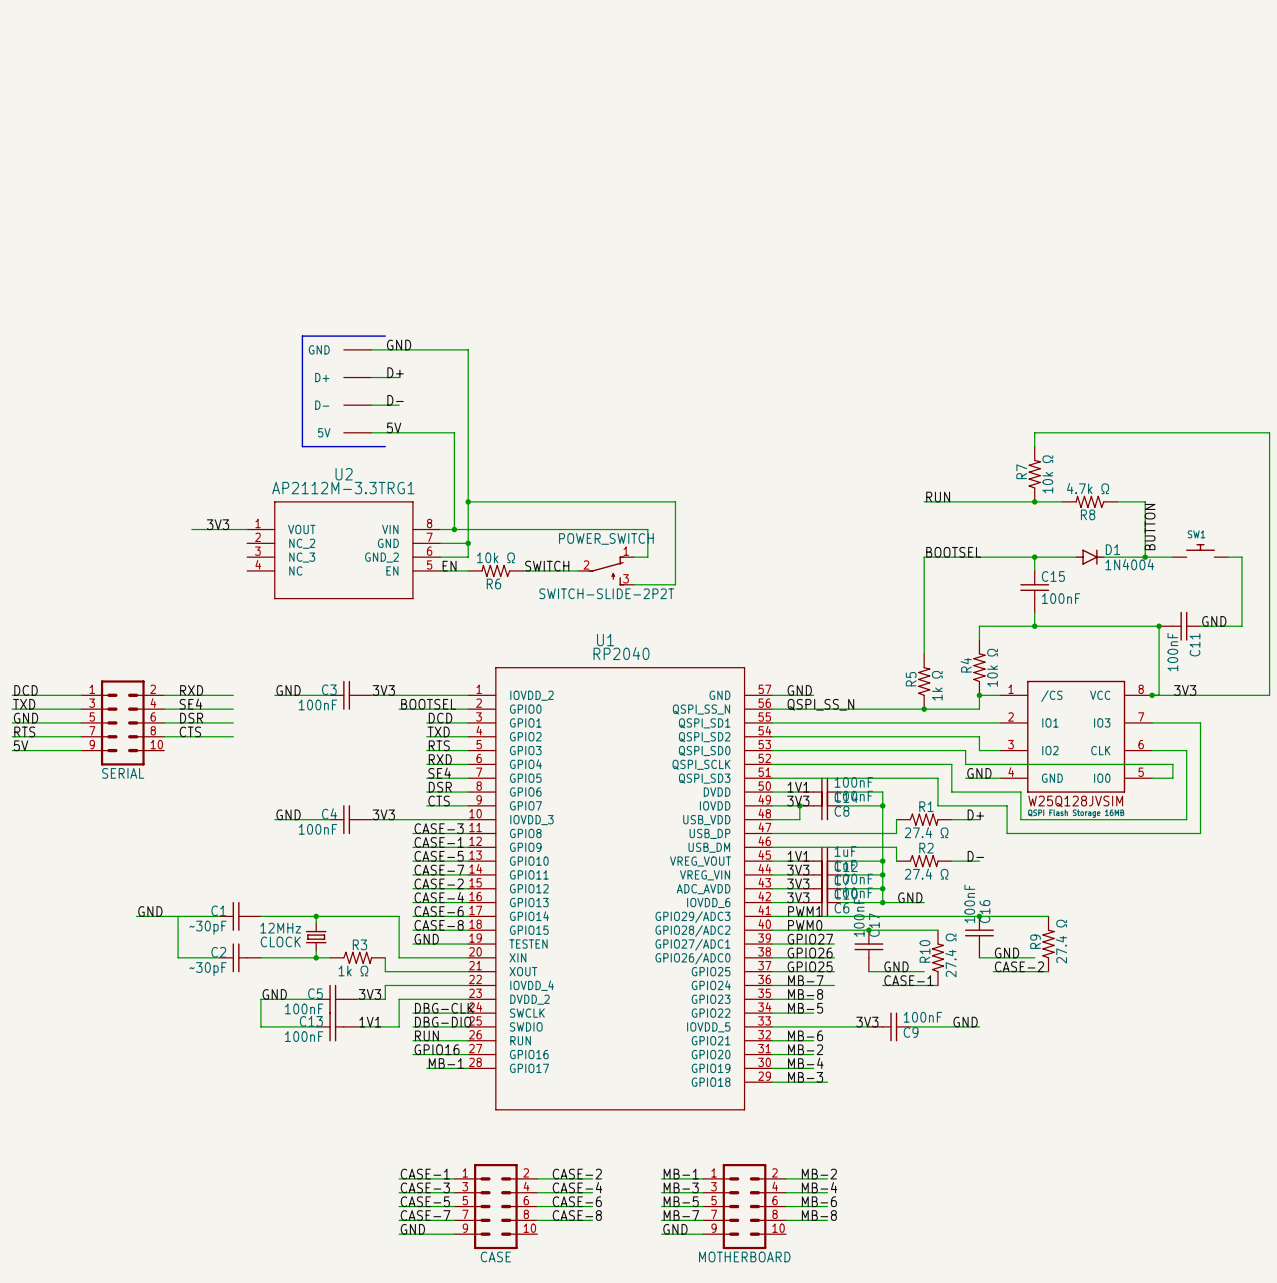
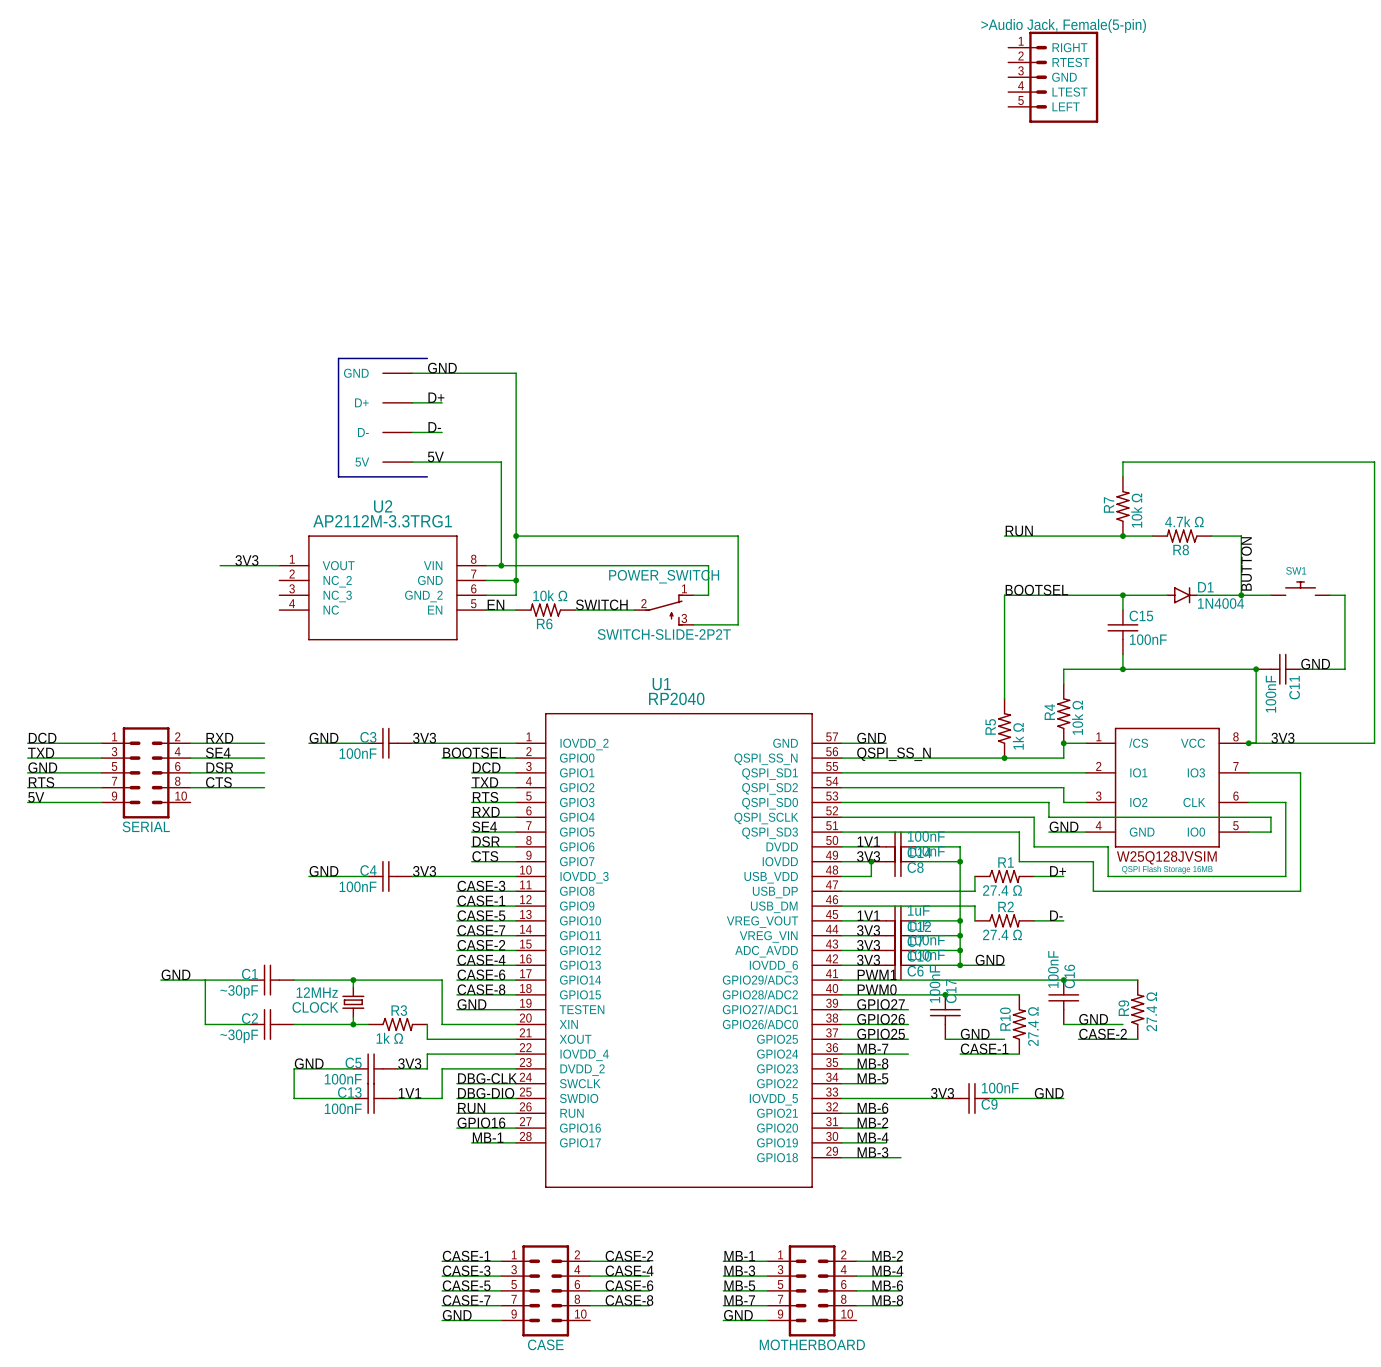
part: none -> (1053, 77)

